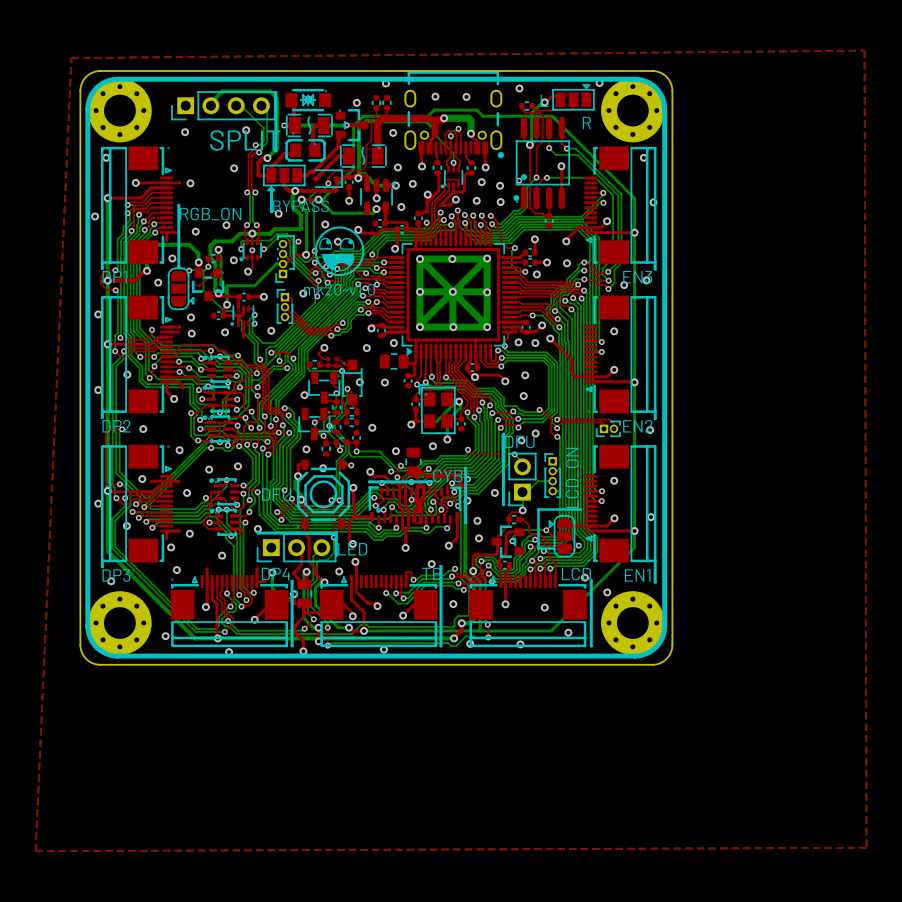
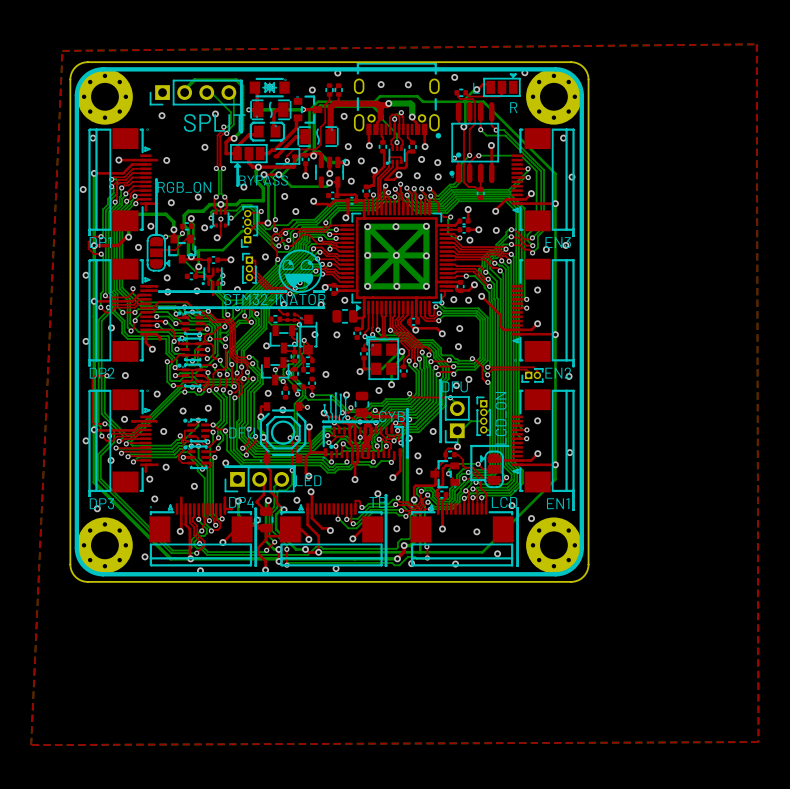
drawing position: (339, 251) -> (300, 271)
text: mk20-v1.0 (339, 289) -> none
line: none -> (159, 291) (286, 291) (286, 292) (159, 292) (159, 291)
line: none -> (314, 291) (323, 291) (323, 292) (314, 292) (314, 291)
text: none -> STM32-INATOR (274, 299)
line: none -> (159, 307) (324, 307) (324, 308) (159, 308) (159, 307)
drawing: none -> [323, 392, 347, 421]

